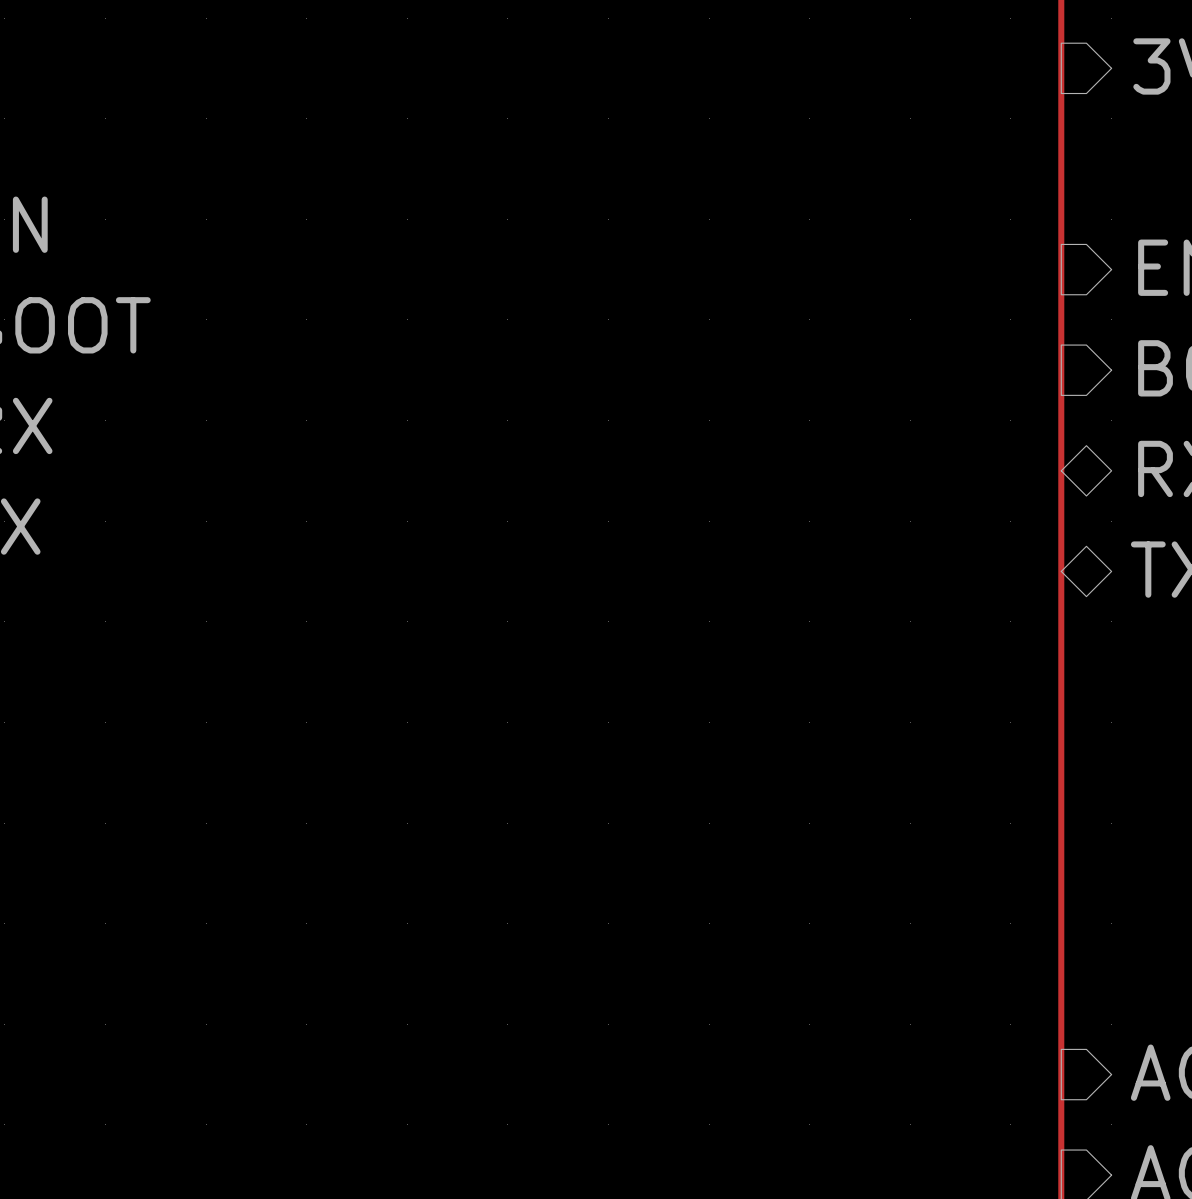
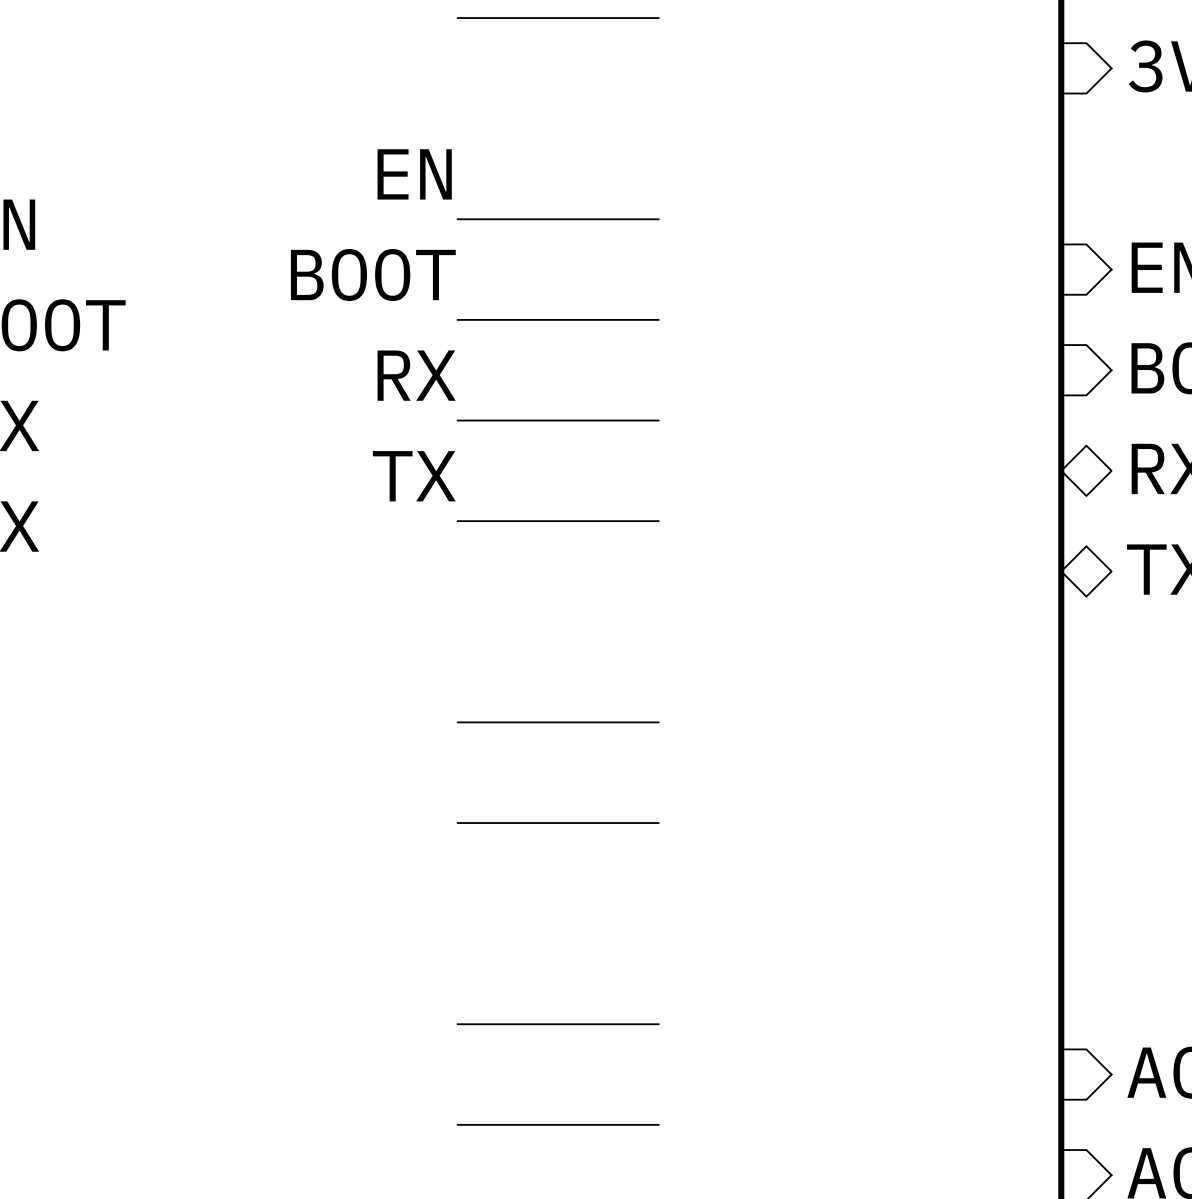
wire: none -> (457, 18) (658, 18)
label: none -> EN (414, 174)
wire: none -> (457, 219) (658, 219)
label: none -> BOOT (373, 275)
wire: none -> (457, 319) (658, 319)
label: none -> RX (416, 375)
wire: none -> (457, 420) (658, 420)
label: none -> TX (414, 476)
wire: none -> (457, 521) (658, 521)
wire: none -> (457, 722) (658, 722)
wire: none -> (457, 823) (658, 823)
wire: none -> (457, 1024) (658, 1024)
wire: none -> (457, 1124) (658, 1124)

